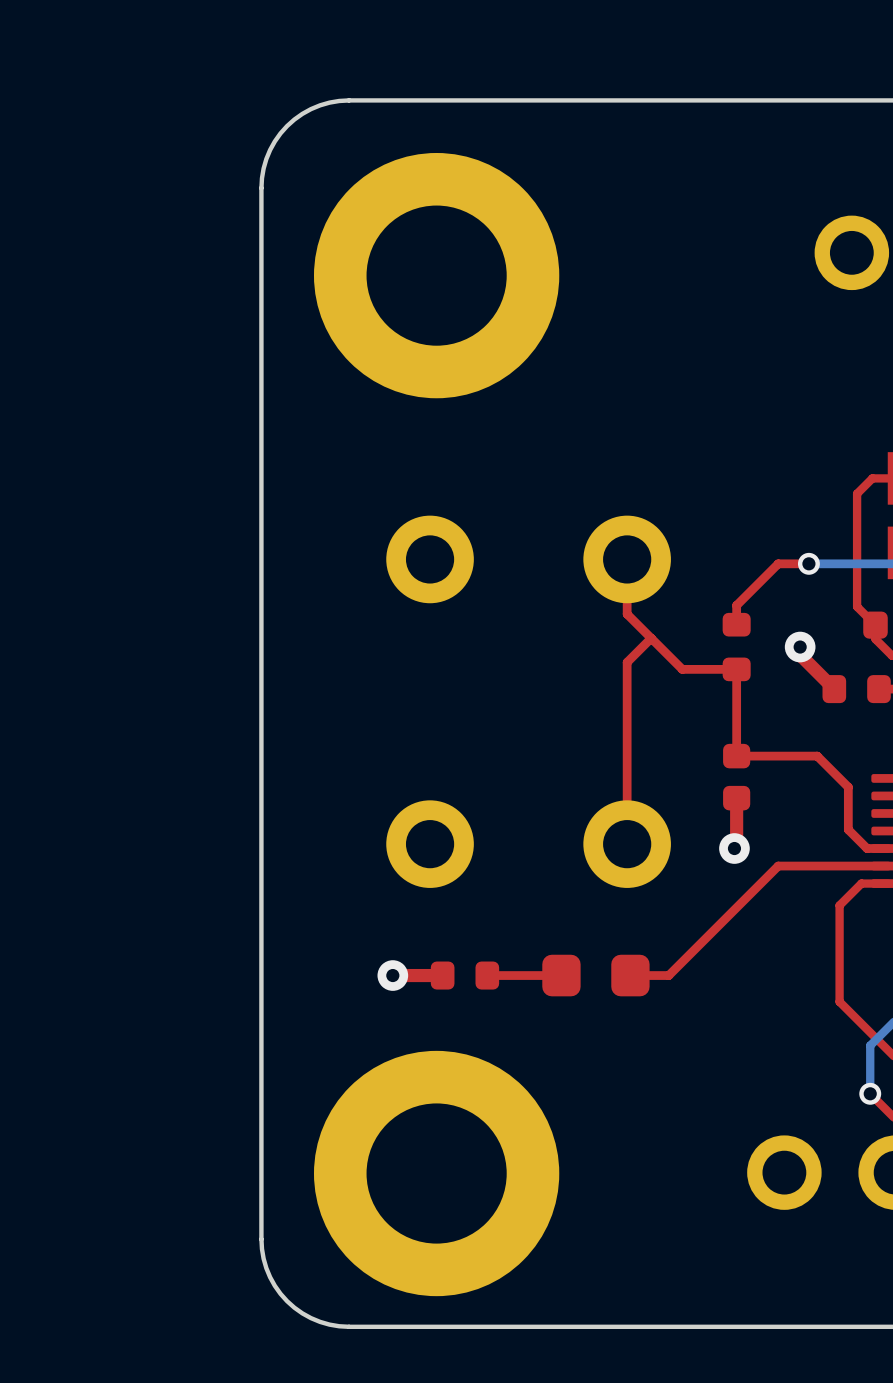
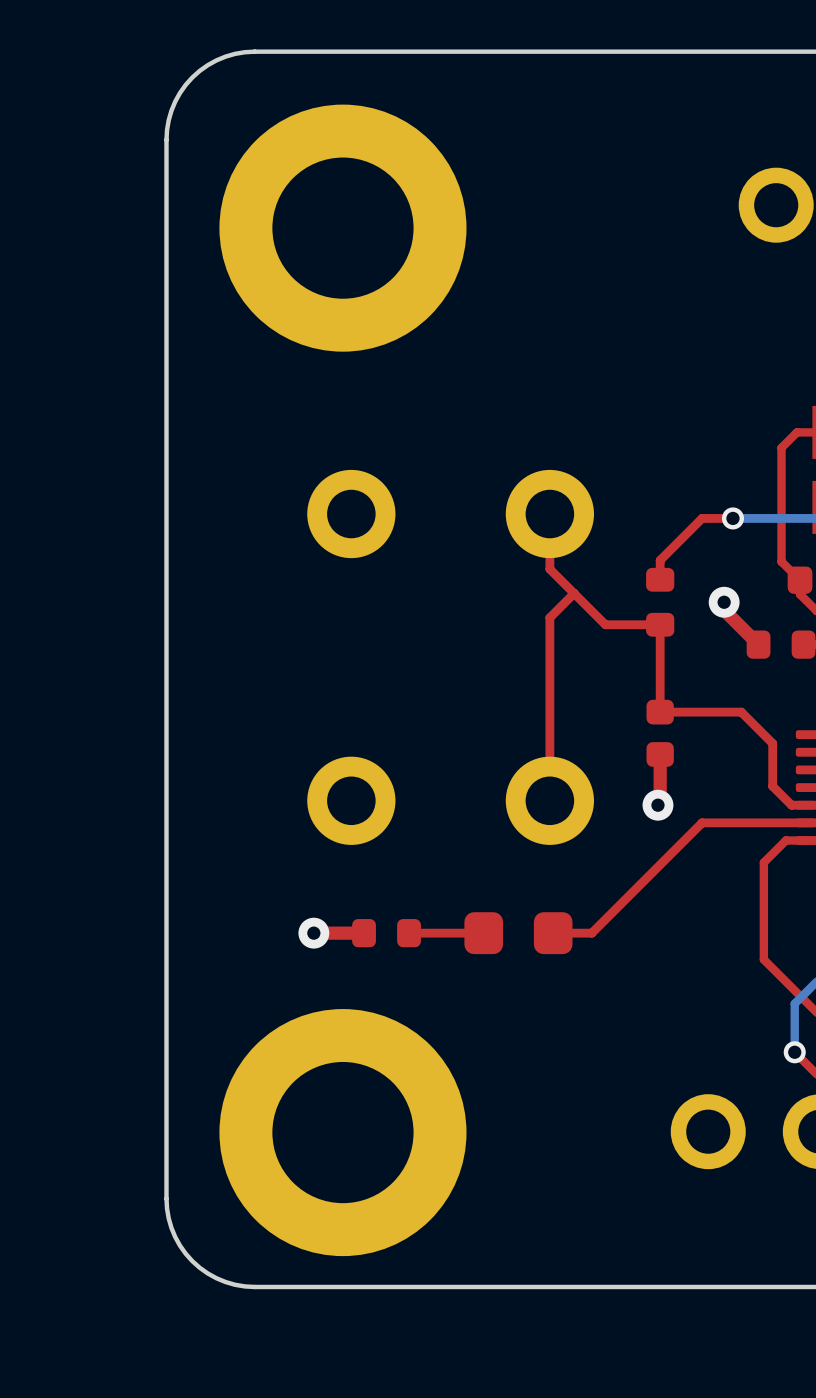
board edge: (349, 100) (320, 105) (302, 113) (287, 126) (274, 141) (266, 159) (261, 188) (261, 1249) (270, 1277) (280, 1293) (294, 1307) (320, 1321) (349, 1326) -> (269, 51) (235, 53) (216, 60) (199, 70) (185, 84) (175, 101) (168, 120) (166, 139) (167, 1208) (175, 1237) (185, 1253) (199, 1267) (216, 1278) (235, 1284) (269, 1286)
part position: (436, 275) -> (342, 228)
part position: (436, 1173) -> (342, 1132)

